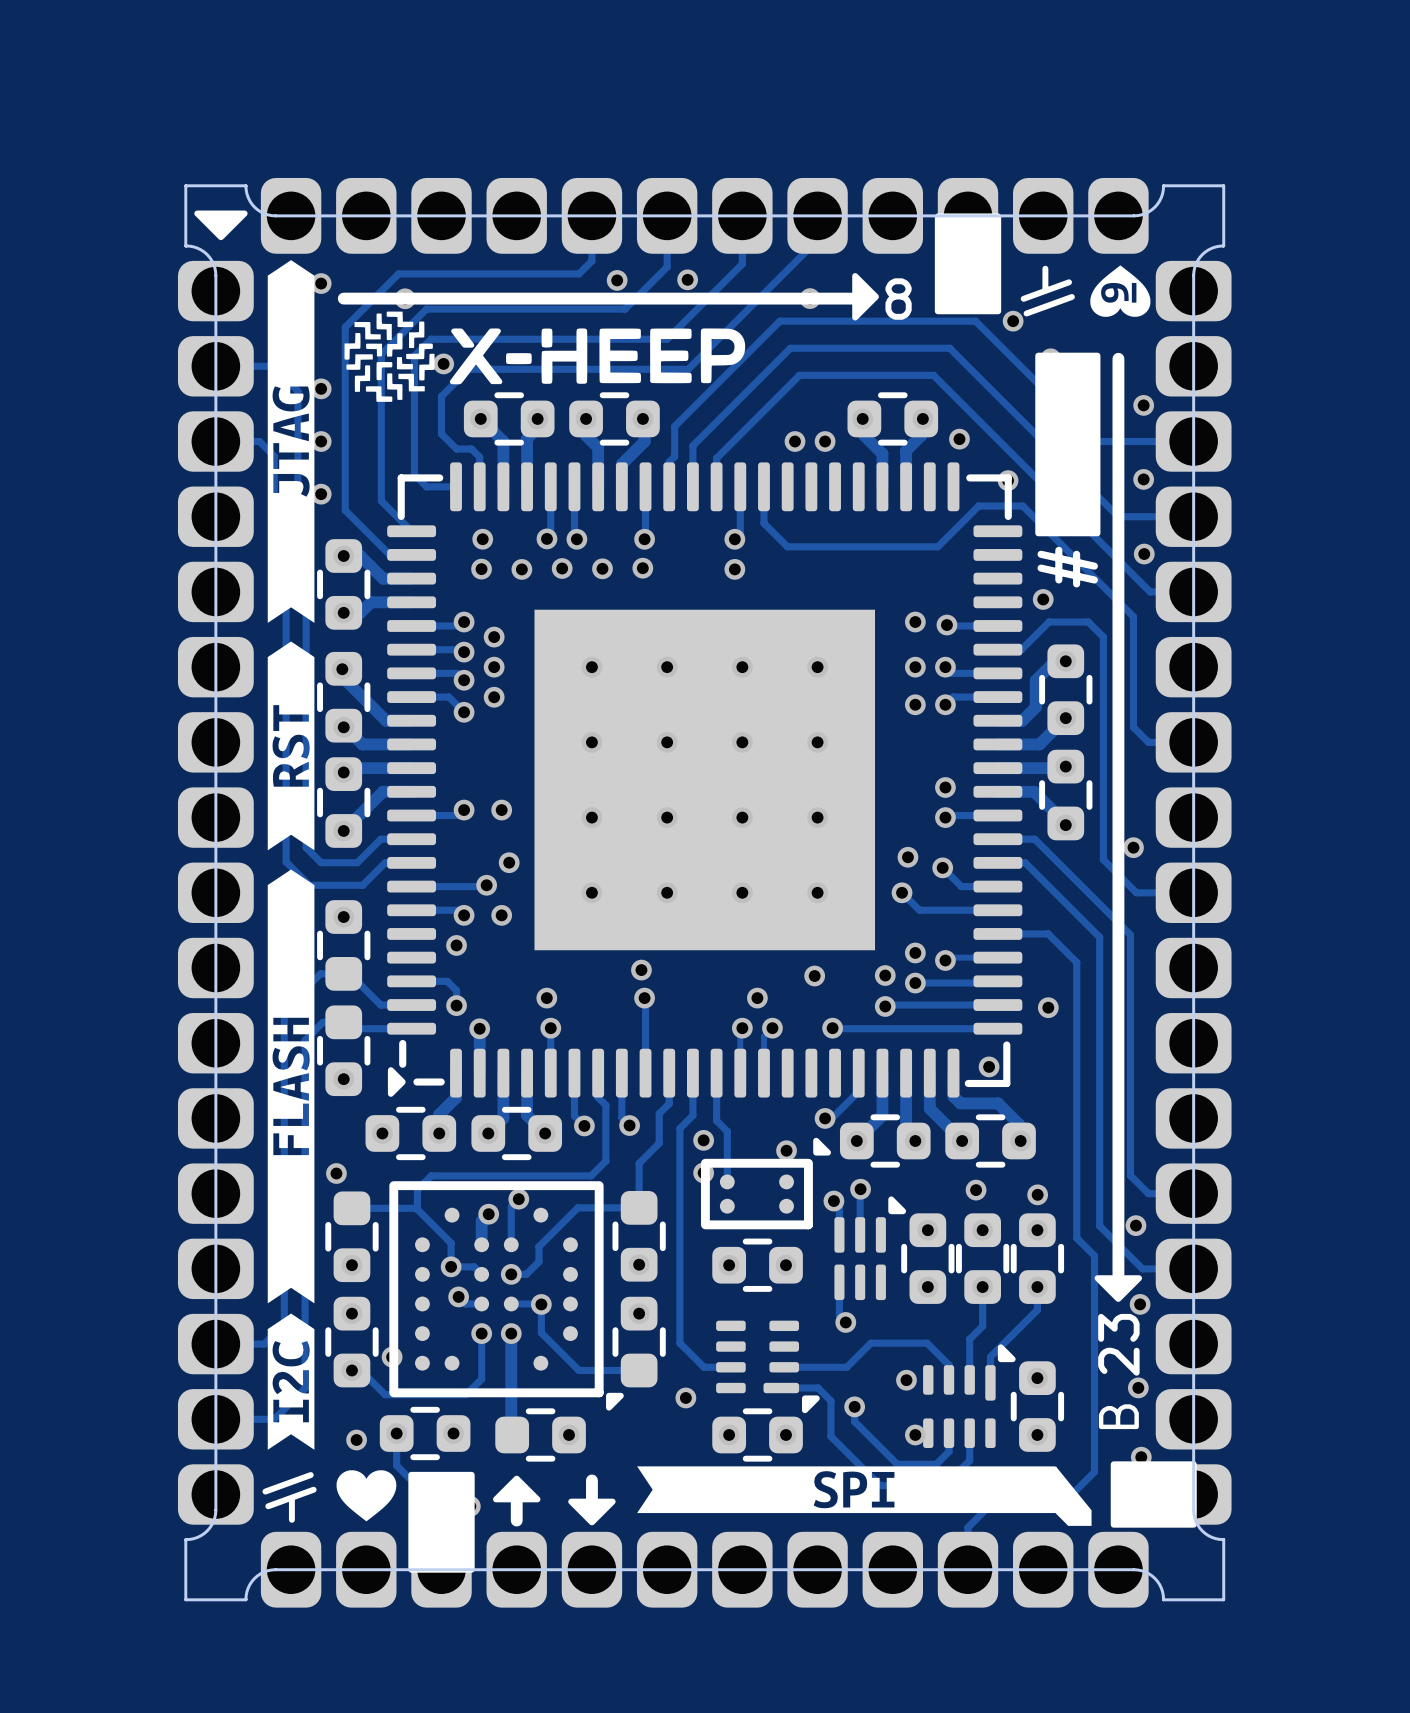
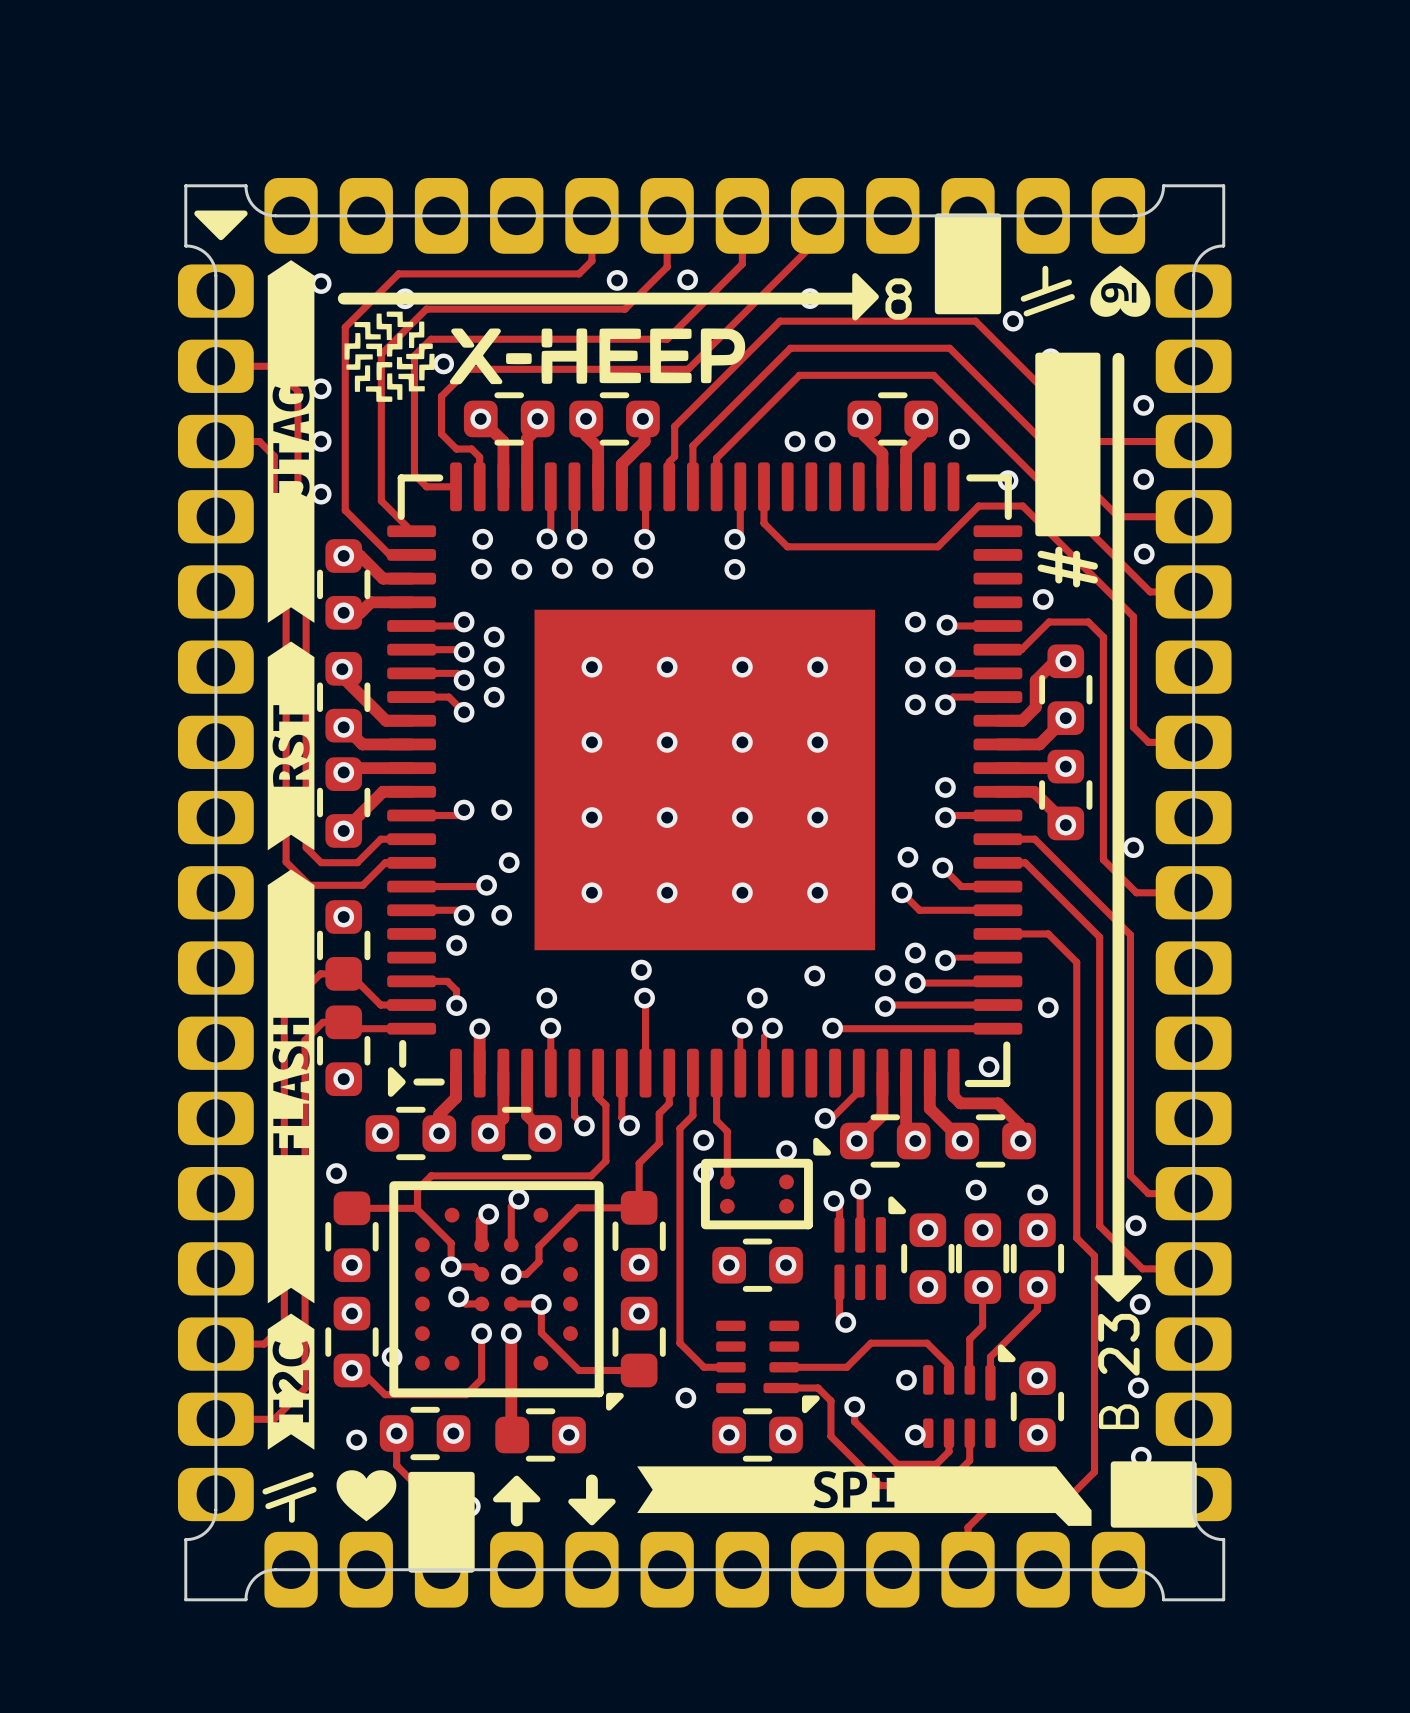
part footprint: [177, 177, 1232, 1608] -> [177, 177, 1232, 1608]

